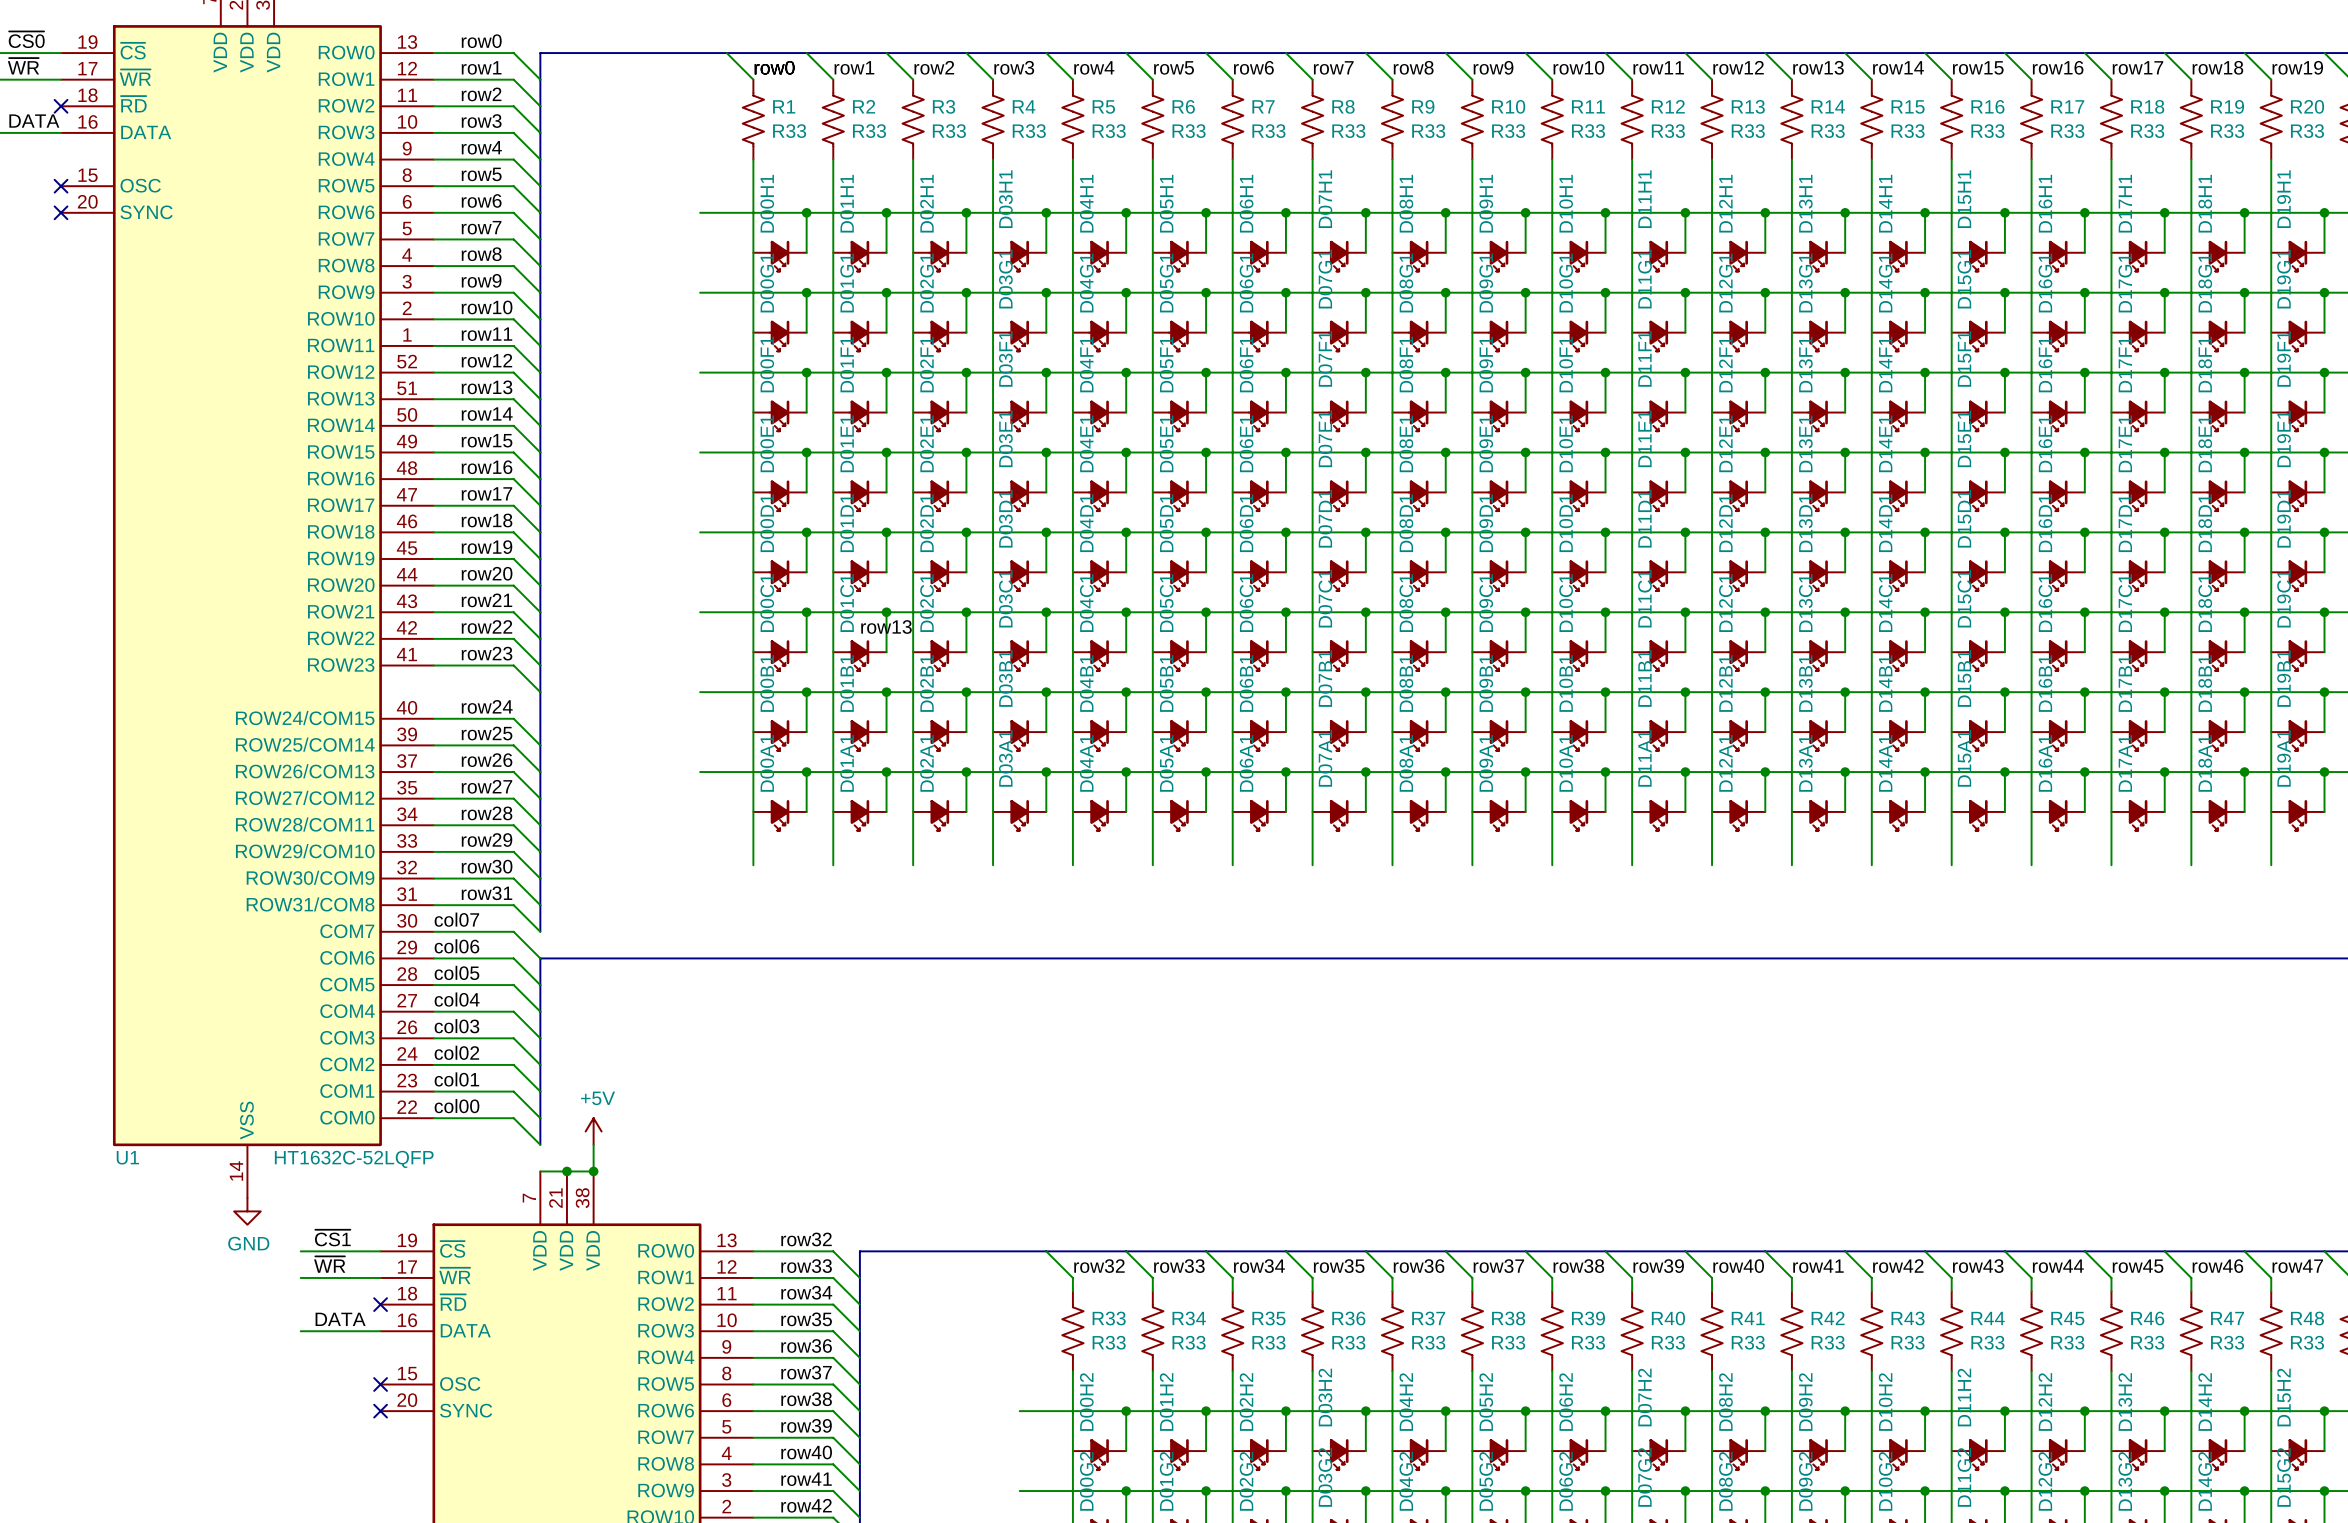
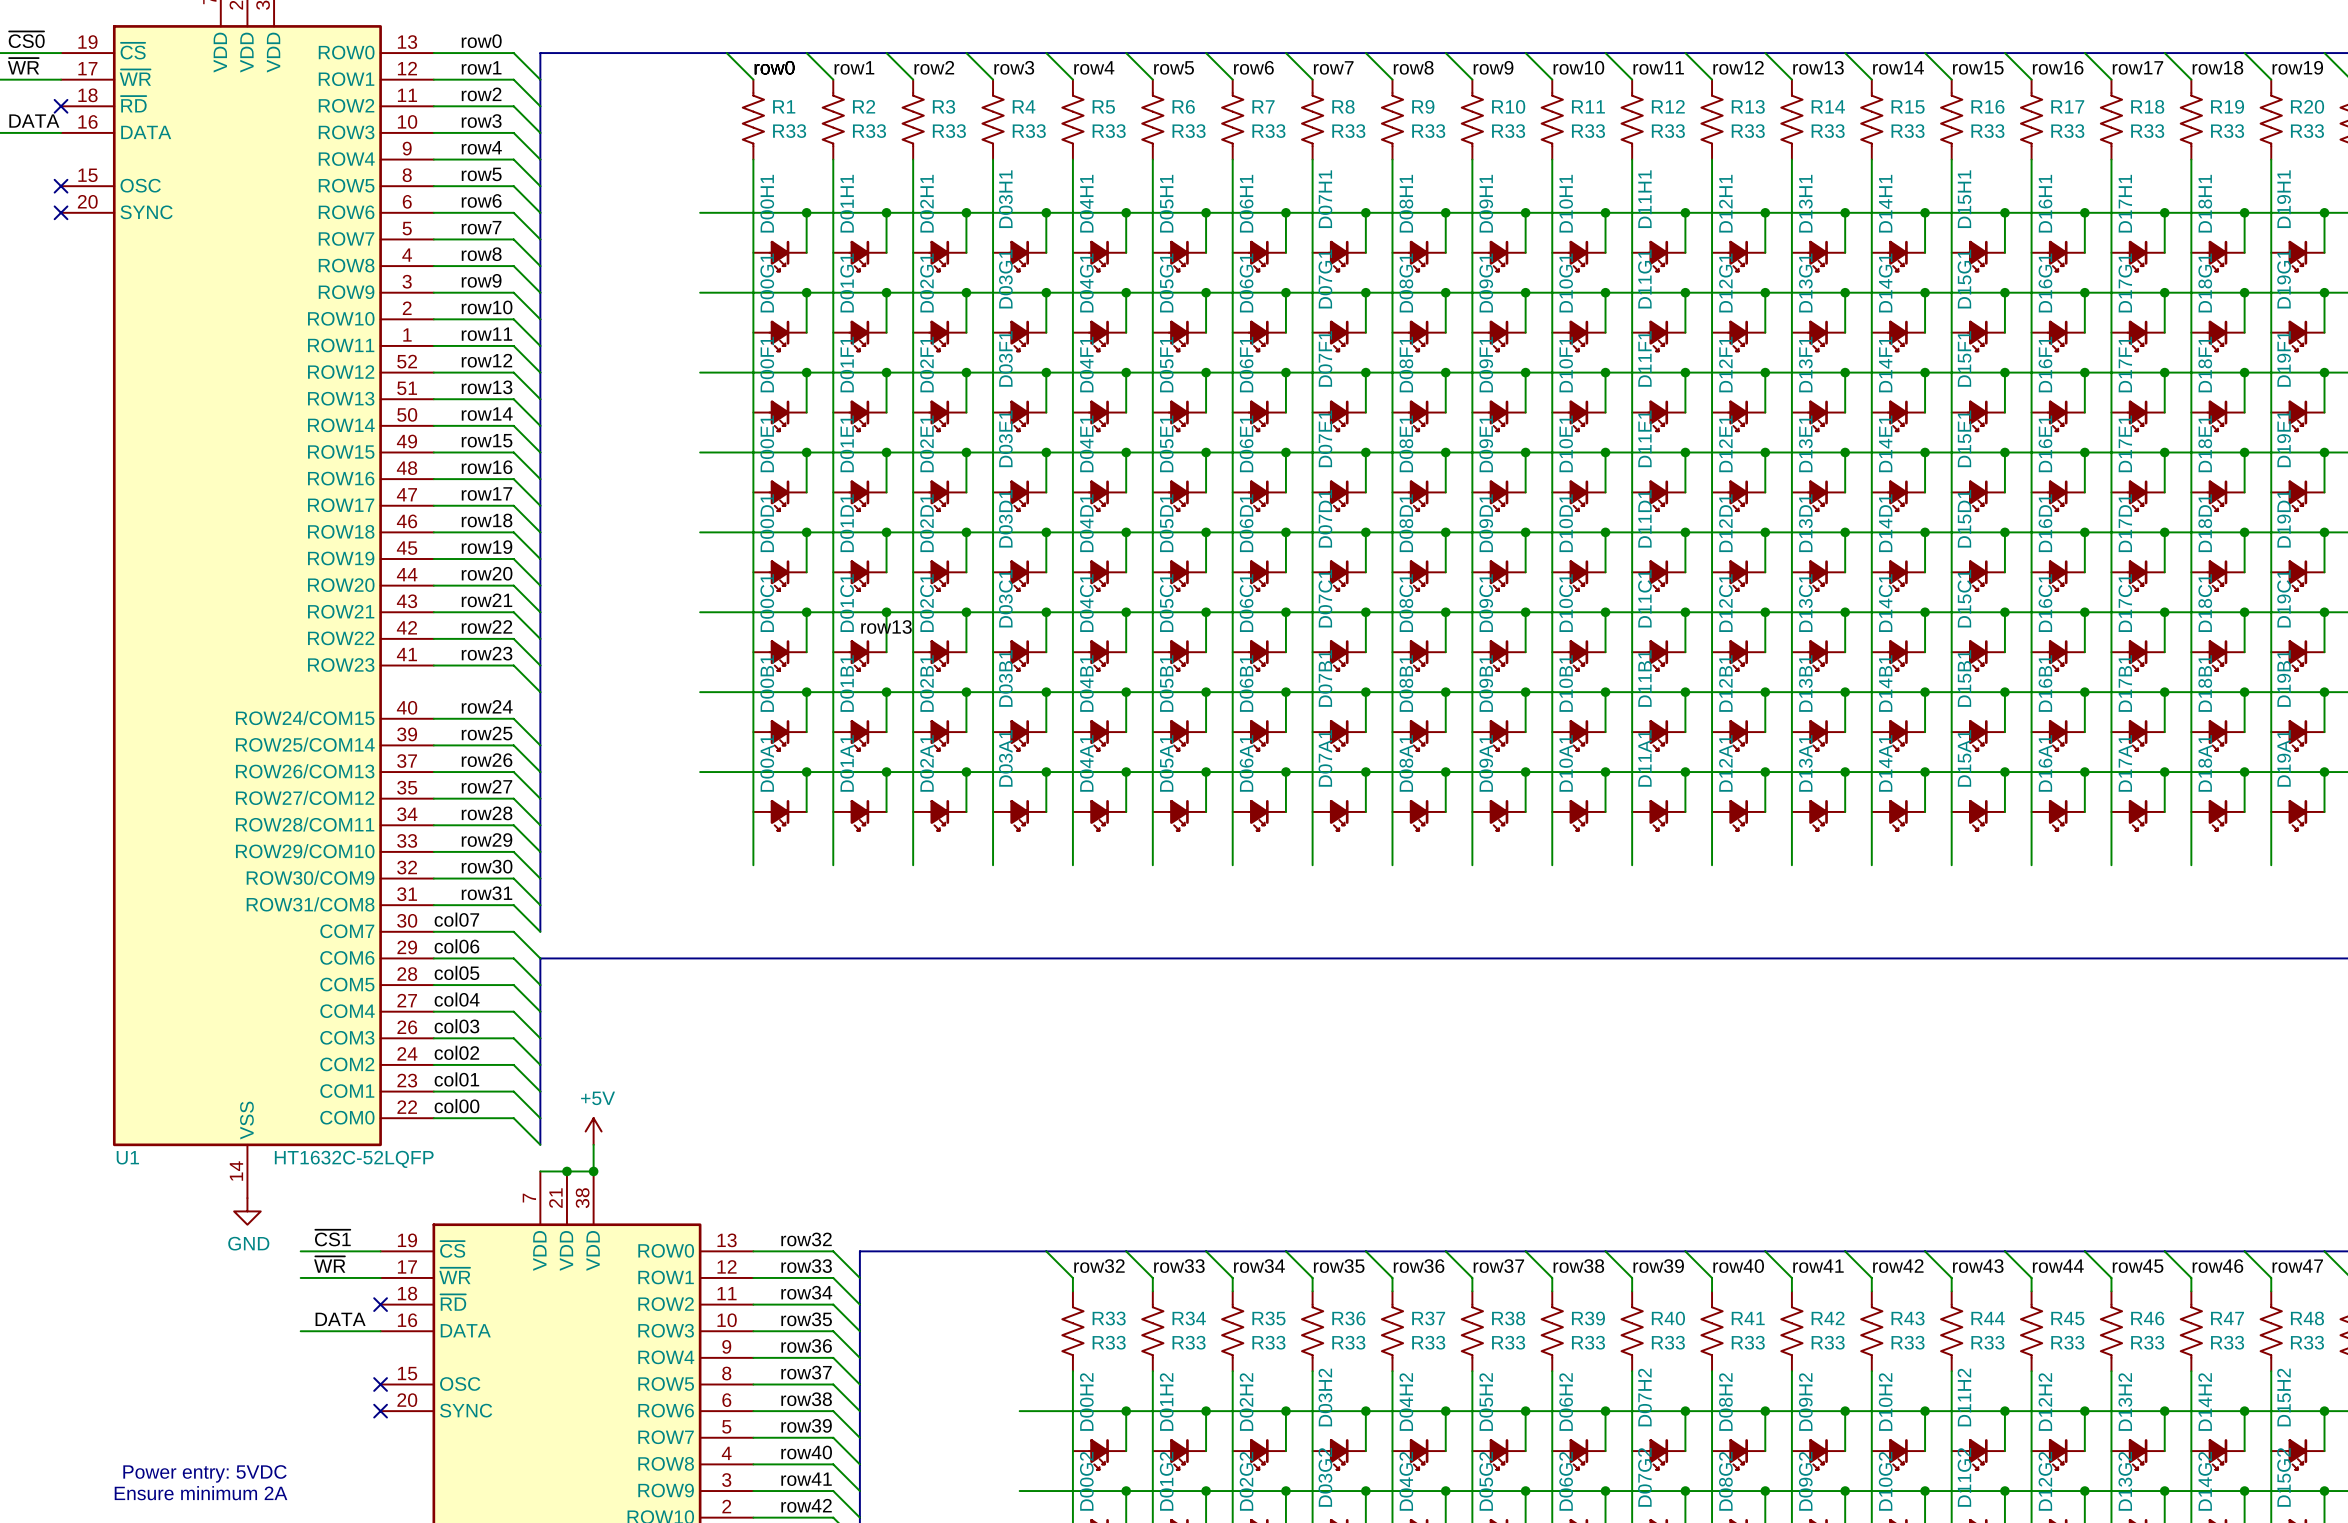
text: none -> Power entry: 5VDC (204, 1473)
text: none -> Ensure minimum 2A (201, 1493)

